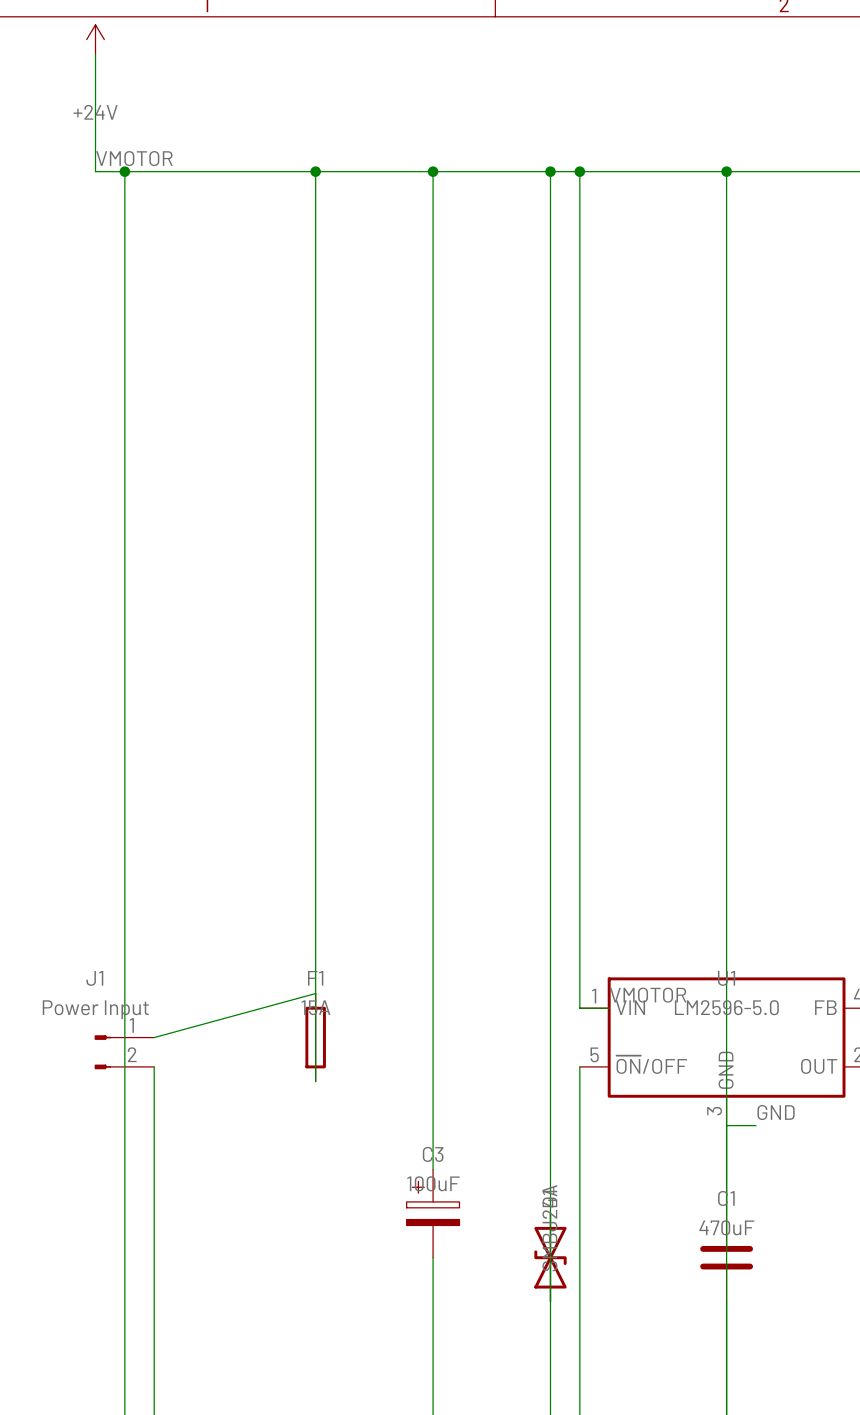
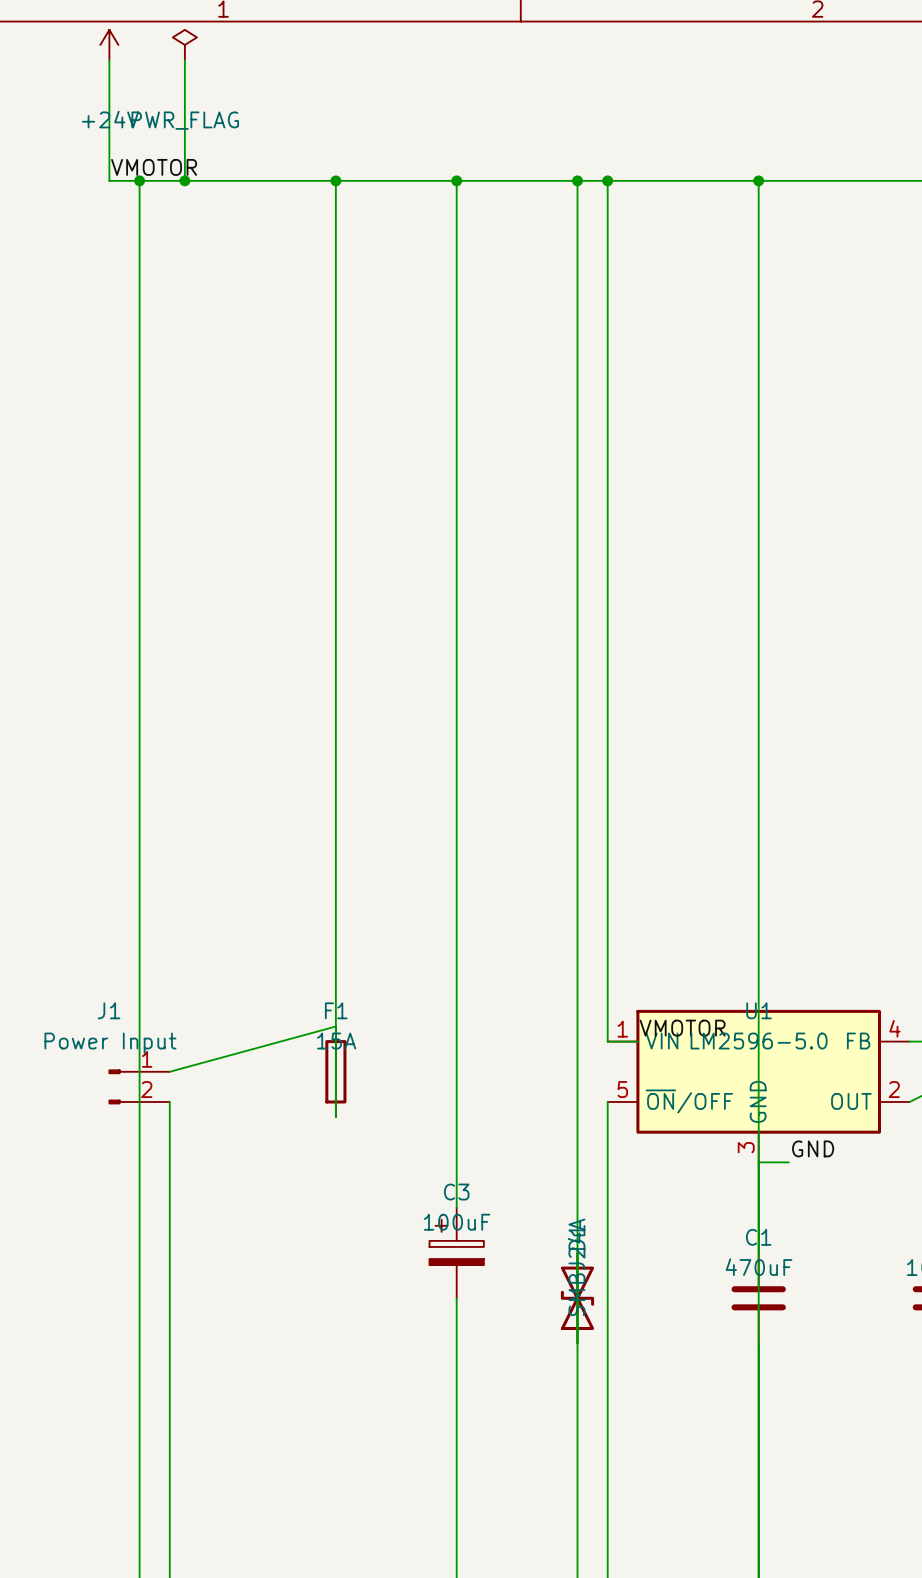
power symbol: none -> PWR_FLAG (184, 44)
wire: none -> (184, 60) (184, 180)
junction: none -> (184, 180)

